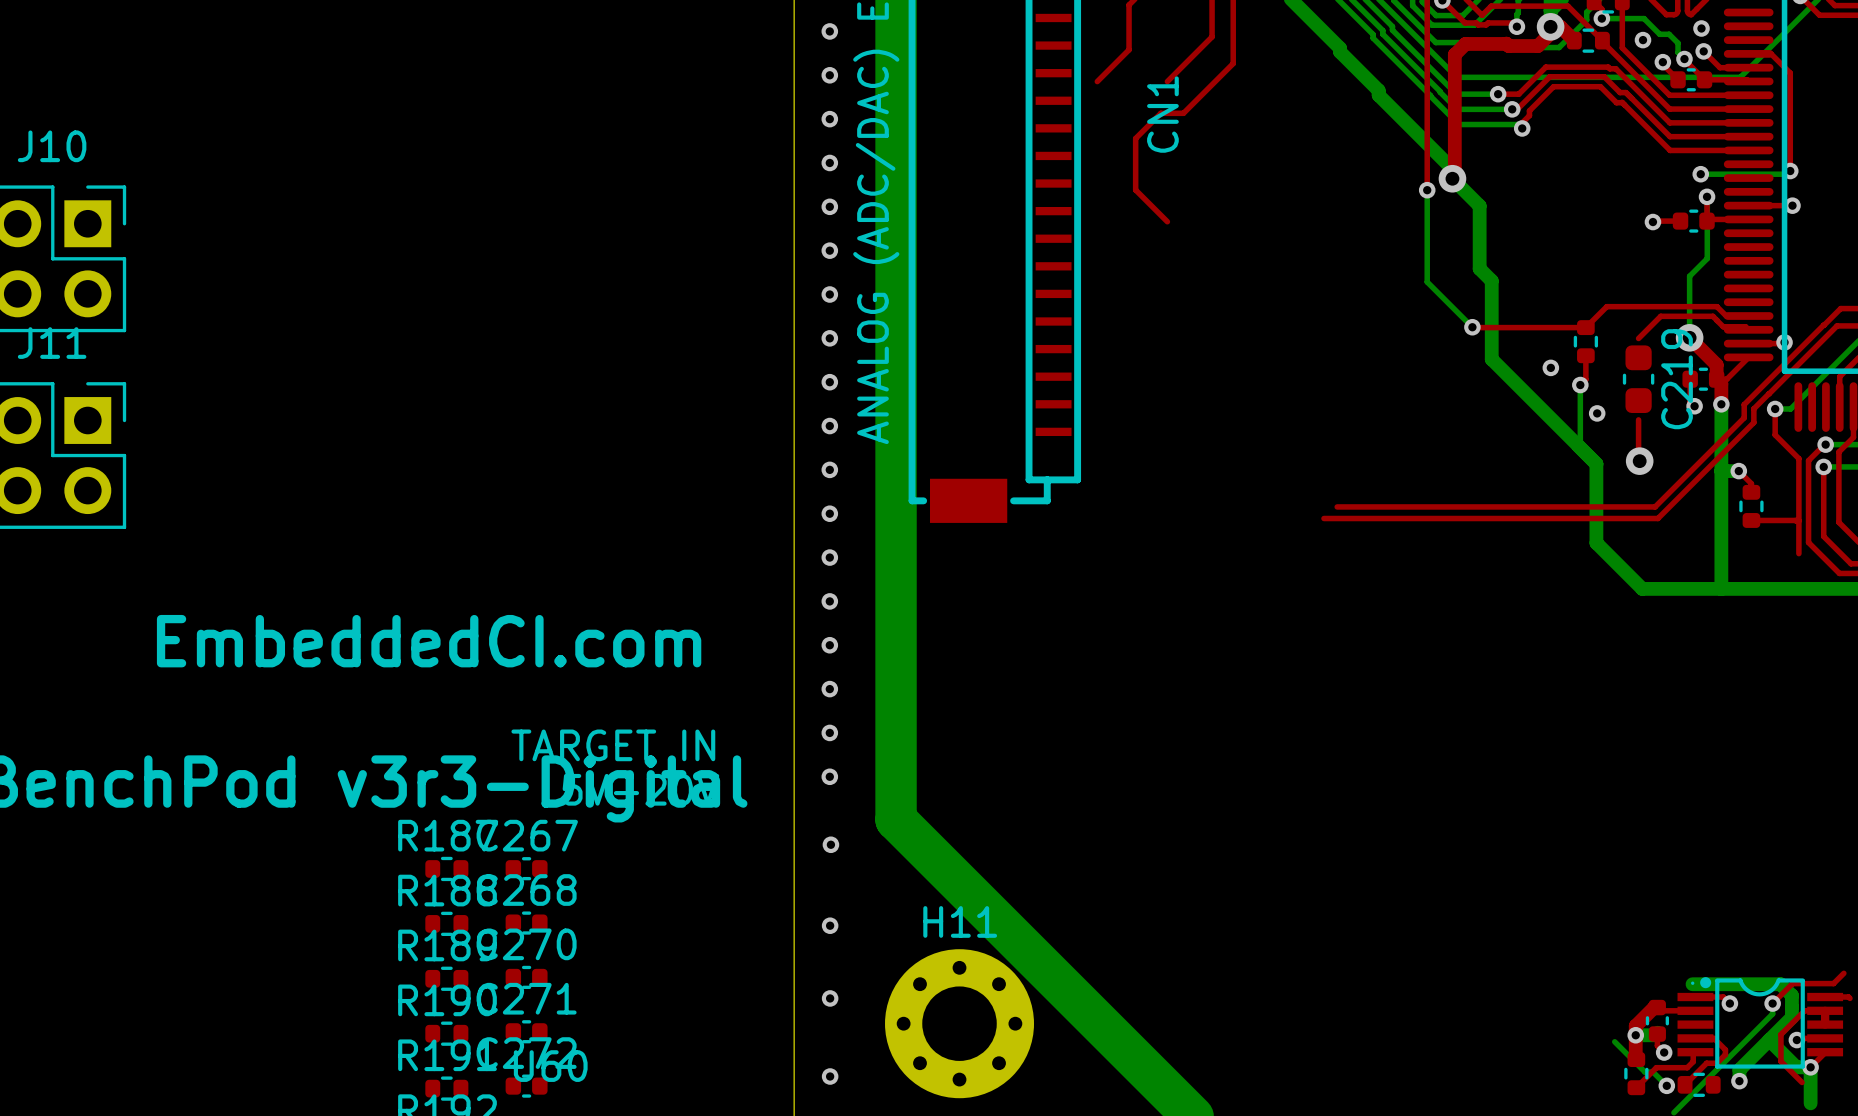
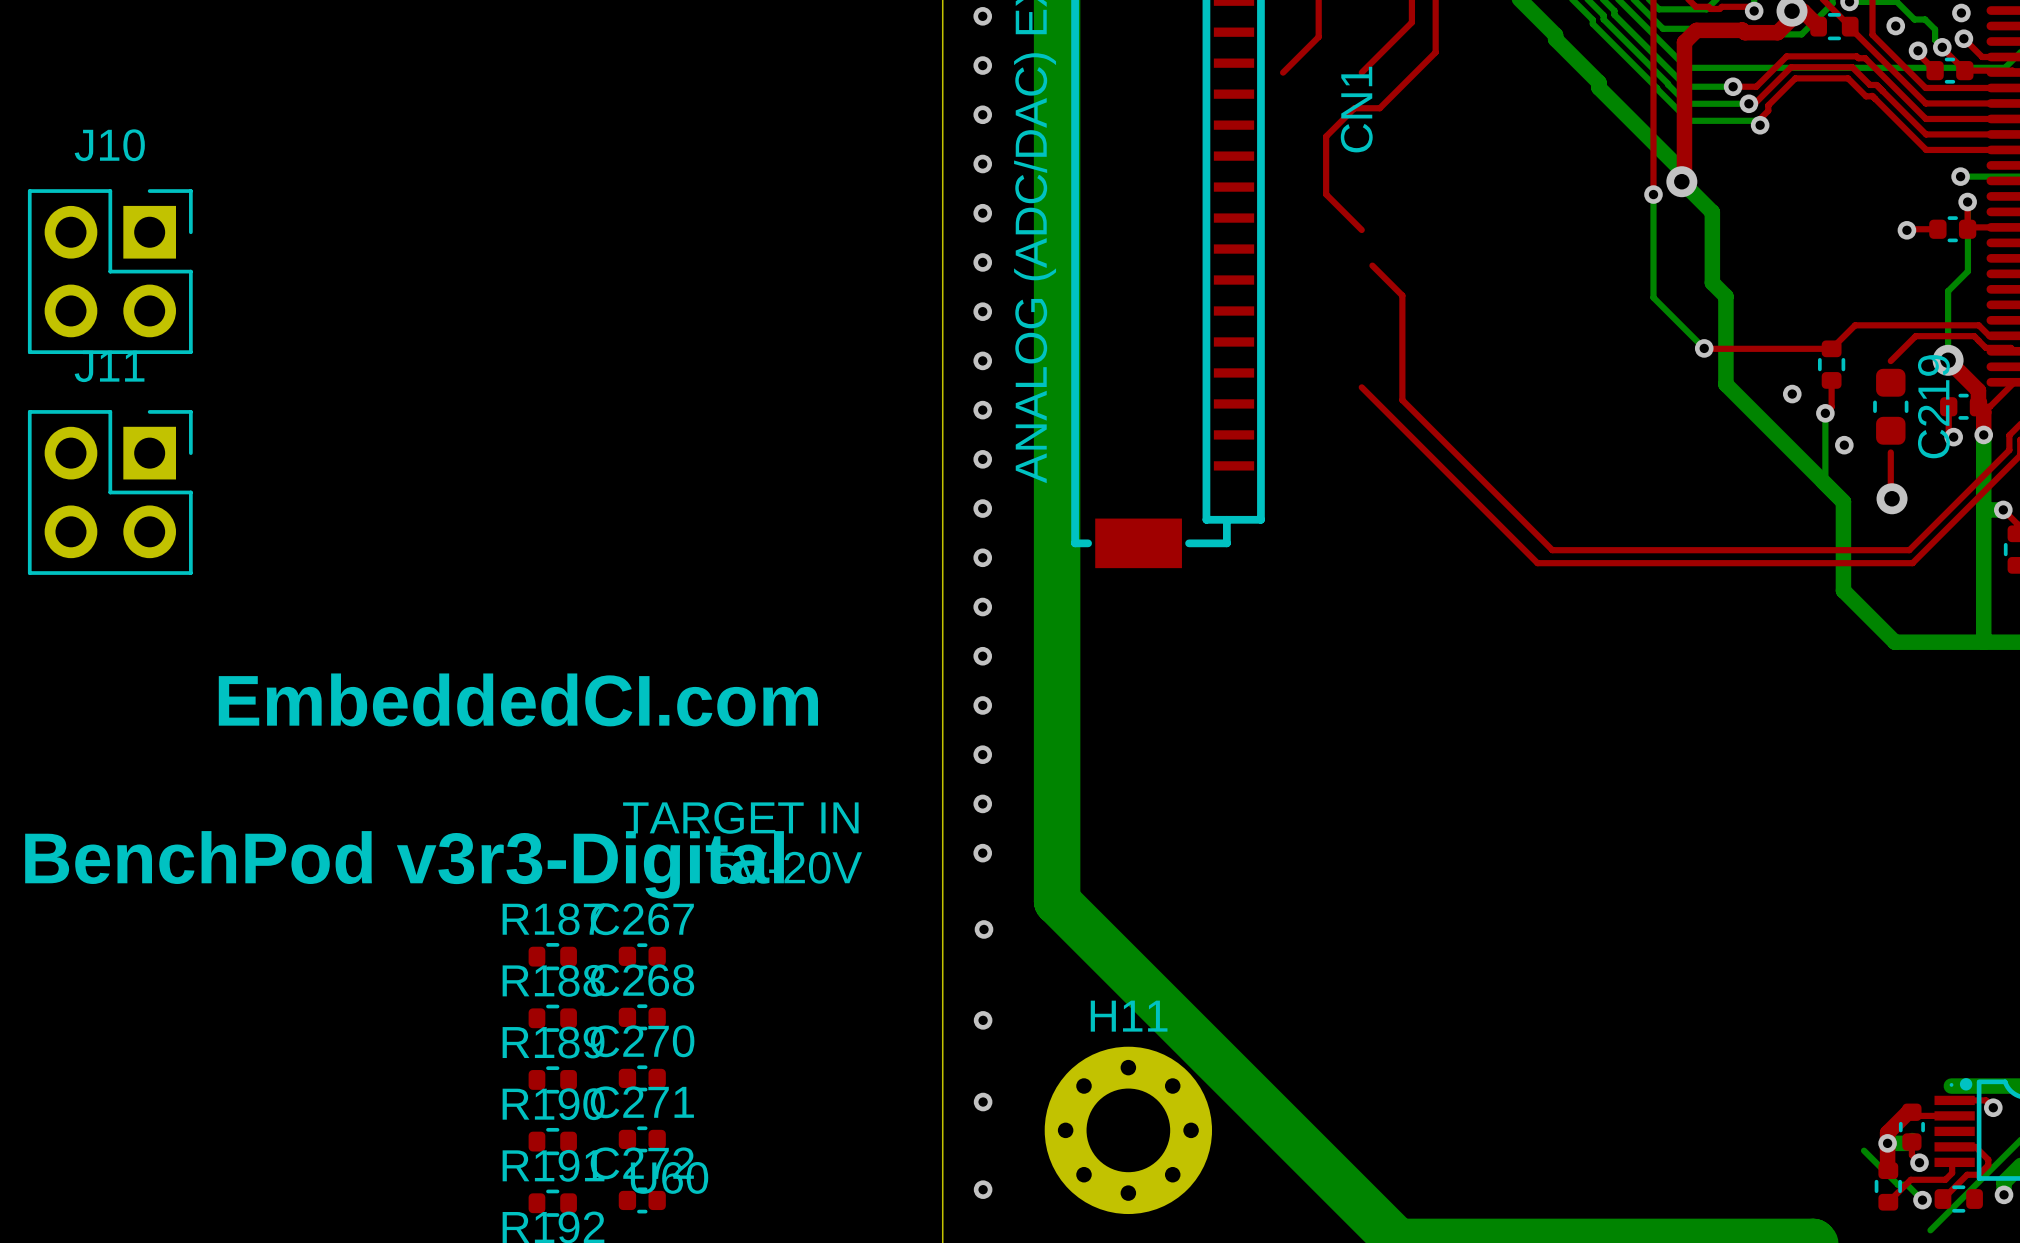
top track: none -> (1372, 265) (1402, 295) (1402, 400) (1552, 550)
top track: none -> (1361, 387) (1537, 563)

